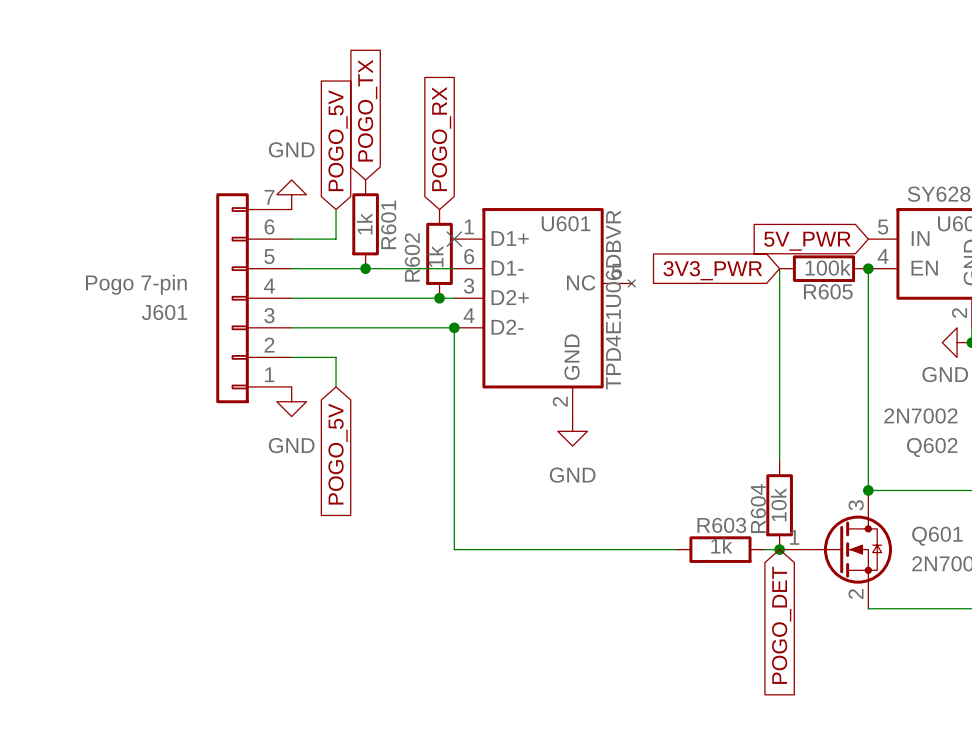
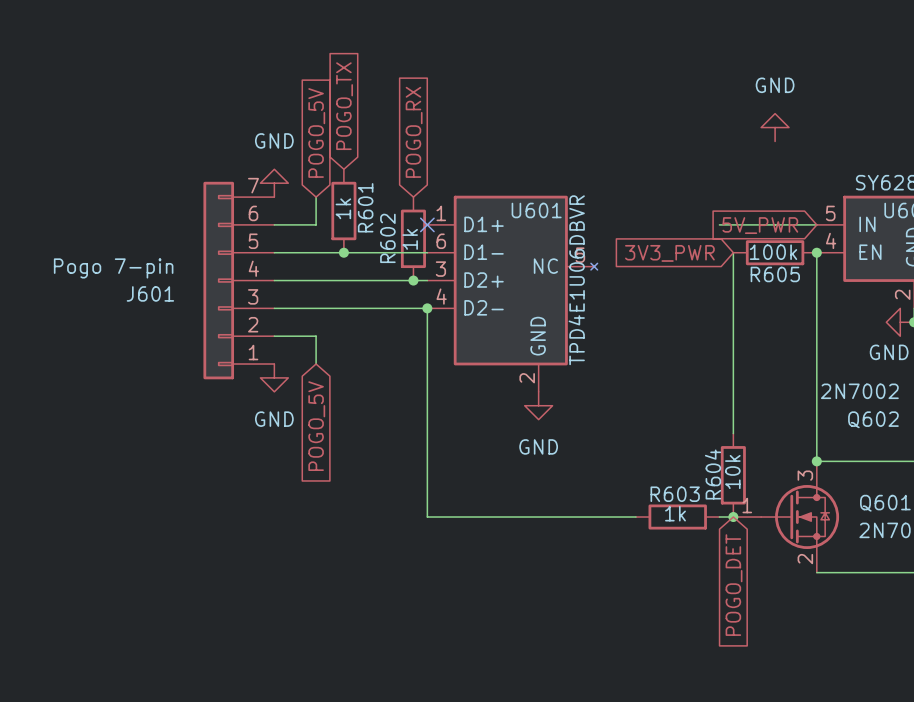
power symbol: none -> GND (775, 127)
wire: none -> (719, 224) (816, 224)

